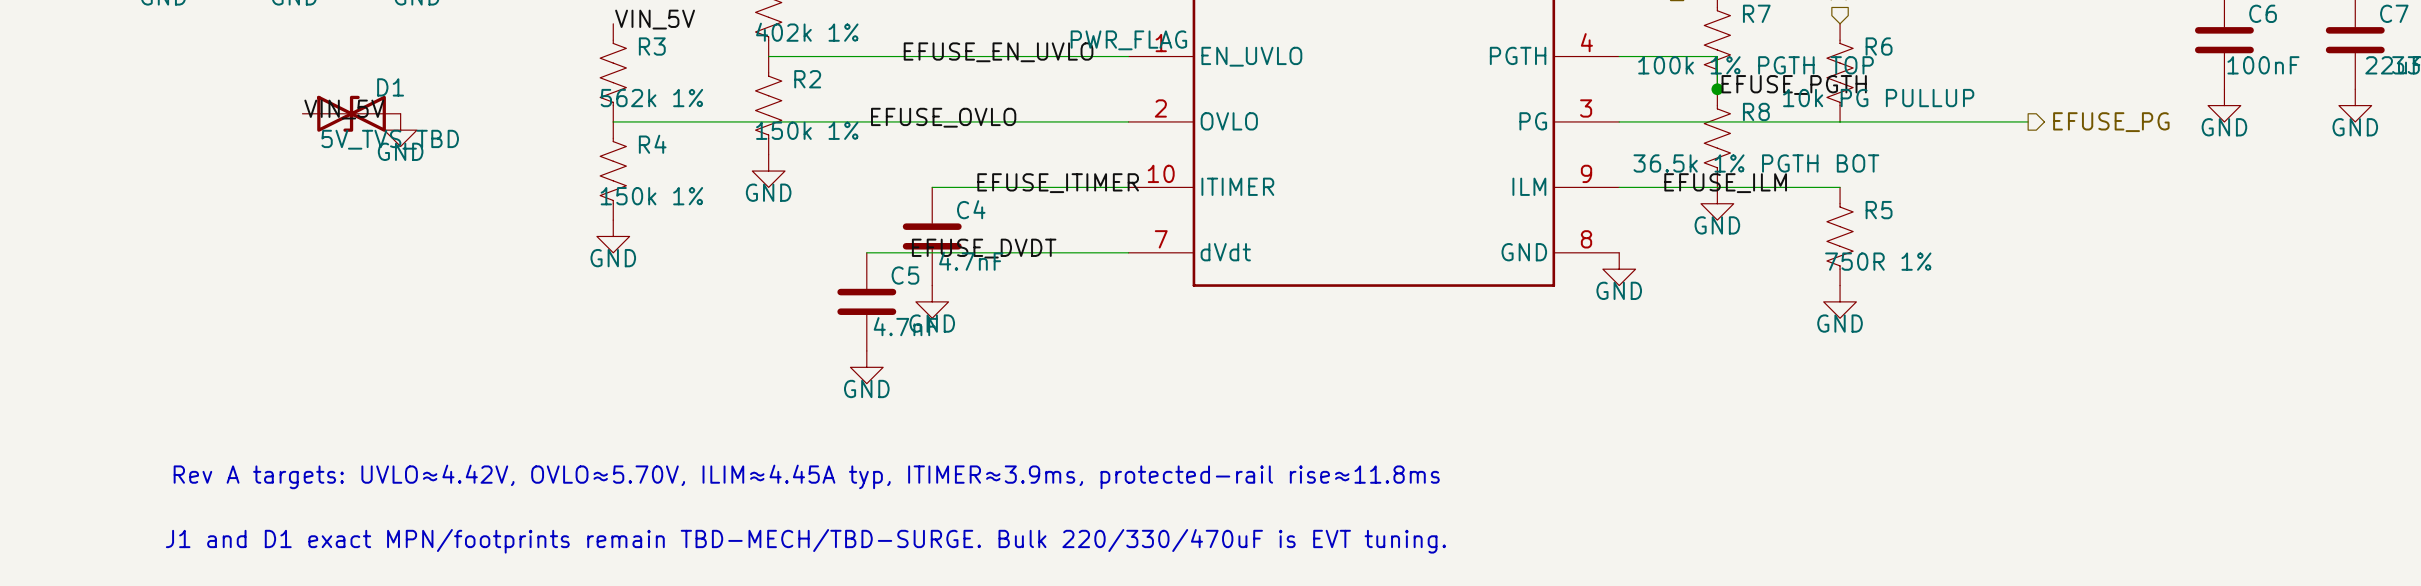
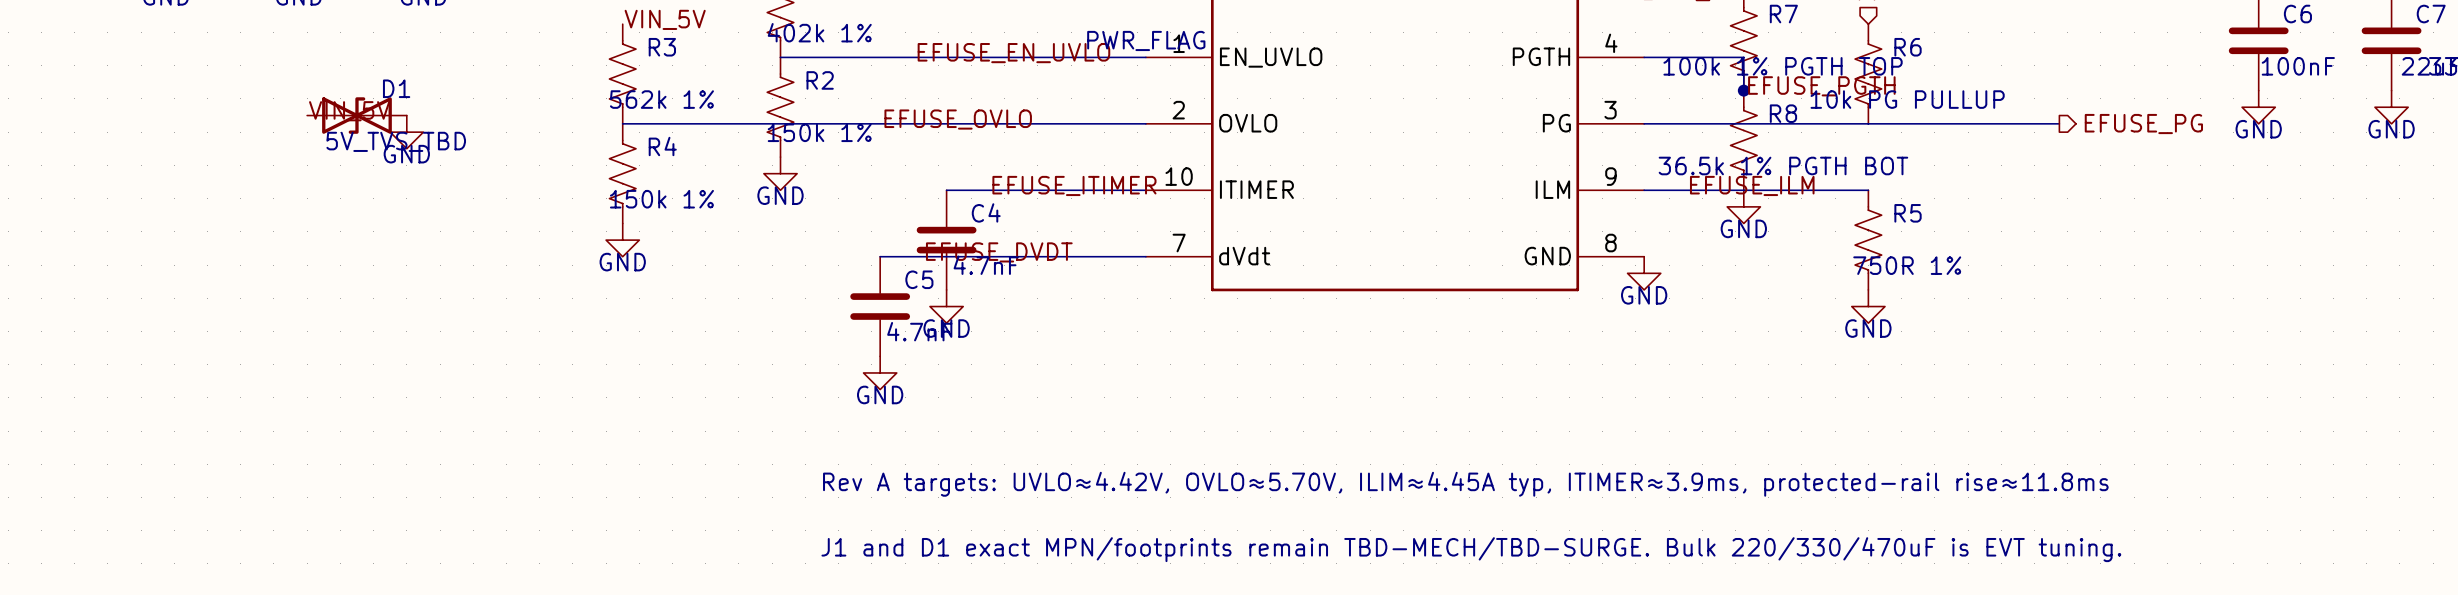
text position: Rev A targets: UVLO≈4.42V, OVLO≈5.70V, ILIM≈4.45A typ, ITIMER≈3.9ms, protected-rail rise≈11.8ms (806, 476) -> Rev A targets: UVLO≈4.42V, OVLO≈5.70V, ILIM≈4.45A typ, ITIMER≈3.9ms, protected-rail rise≈11.8ms (1465, 484)
text position: J1 and D1 exact MPN/footprints remain TBD-MECH/TBD-SURGE. Bulk 220/330/470uF is EVT tuning. (805, 541) -> J1 and D1 exact MPN/footprints remain TBD-MECH/TBD-SURGE. Bulk 220/330/470uF is EVT tuning. (1471, 549)

